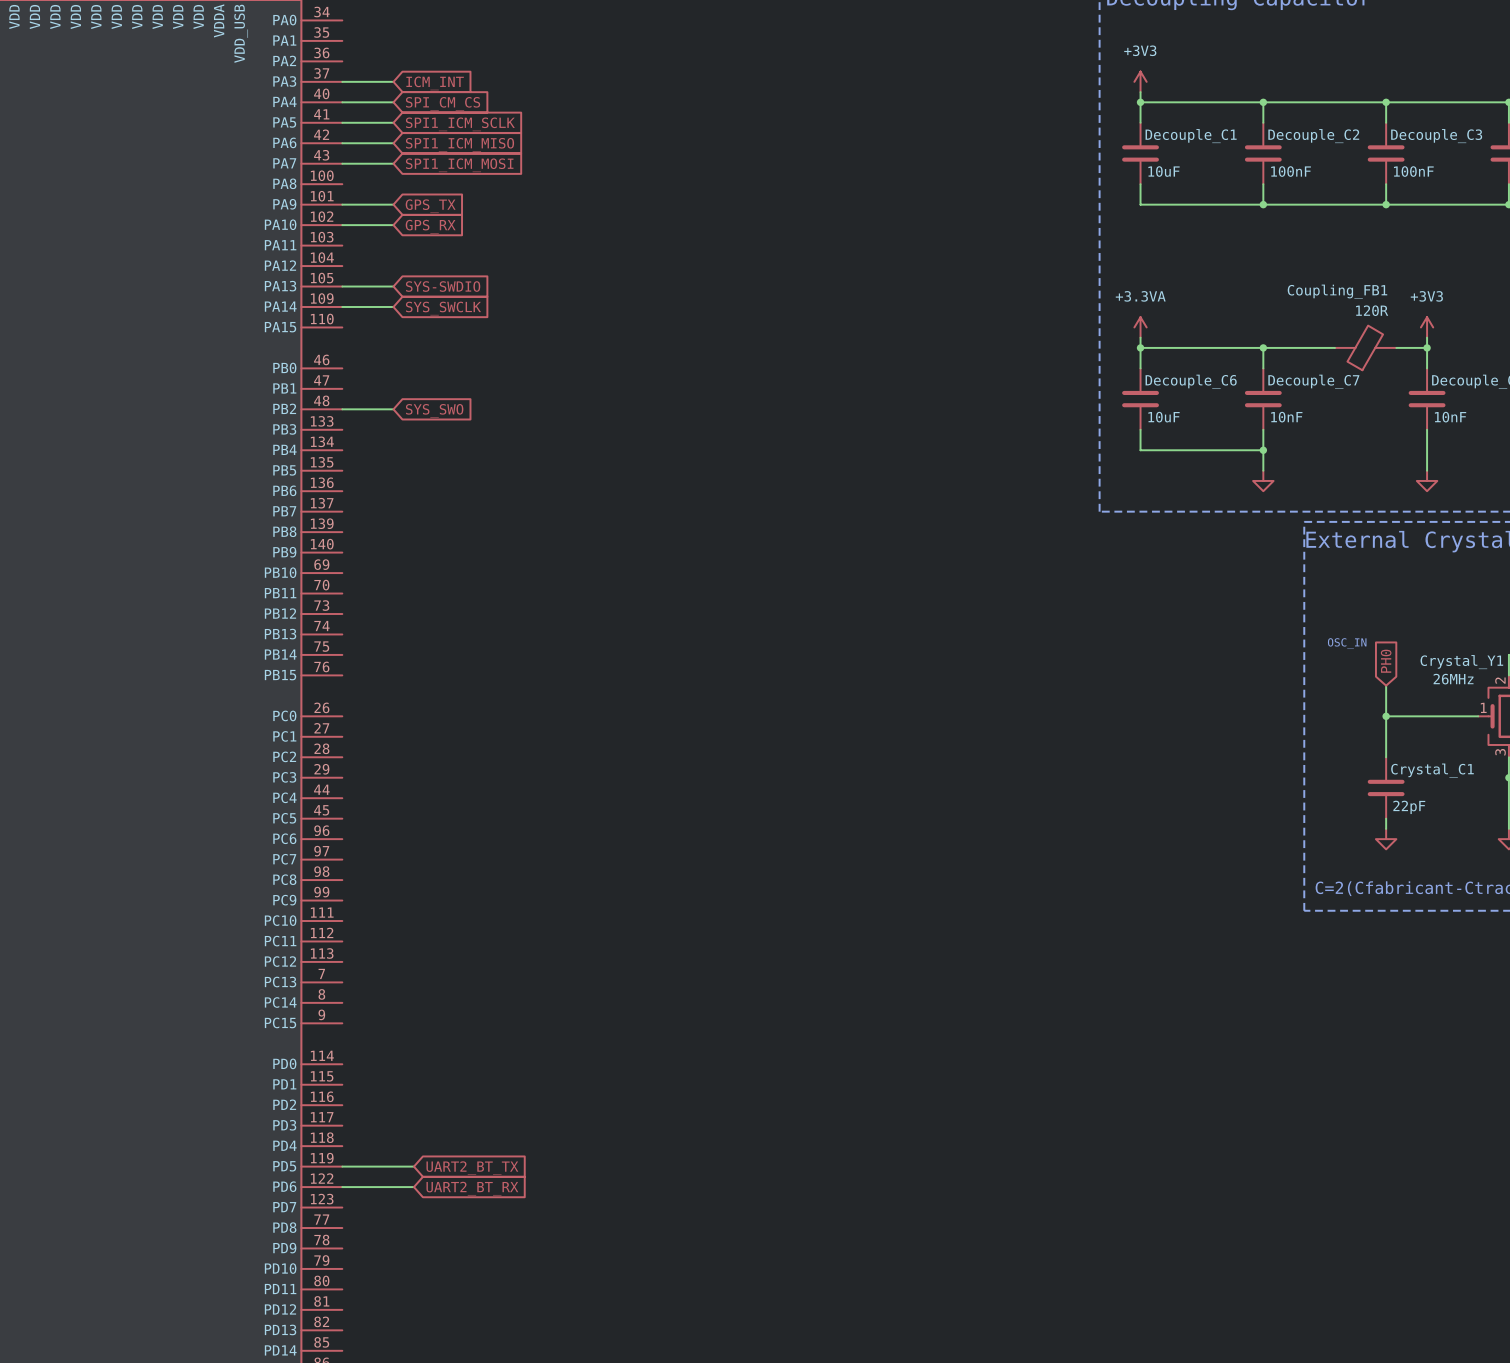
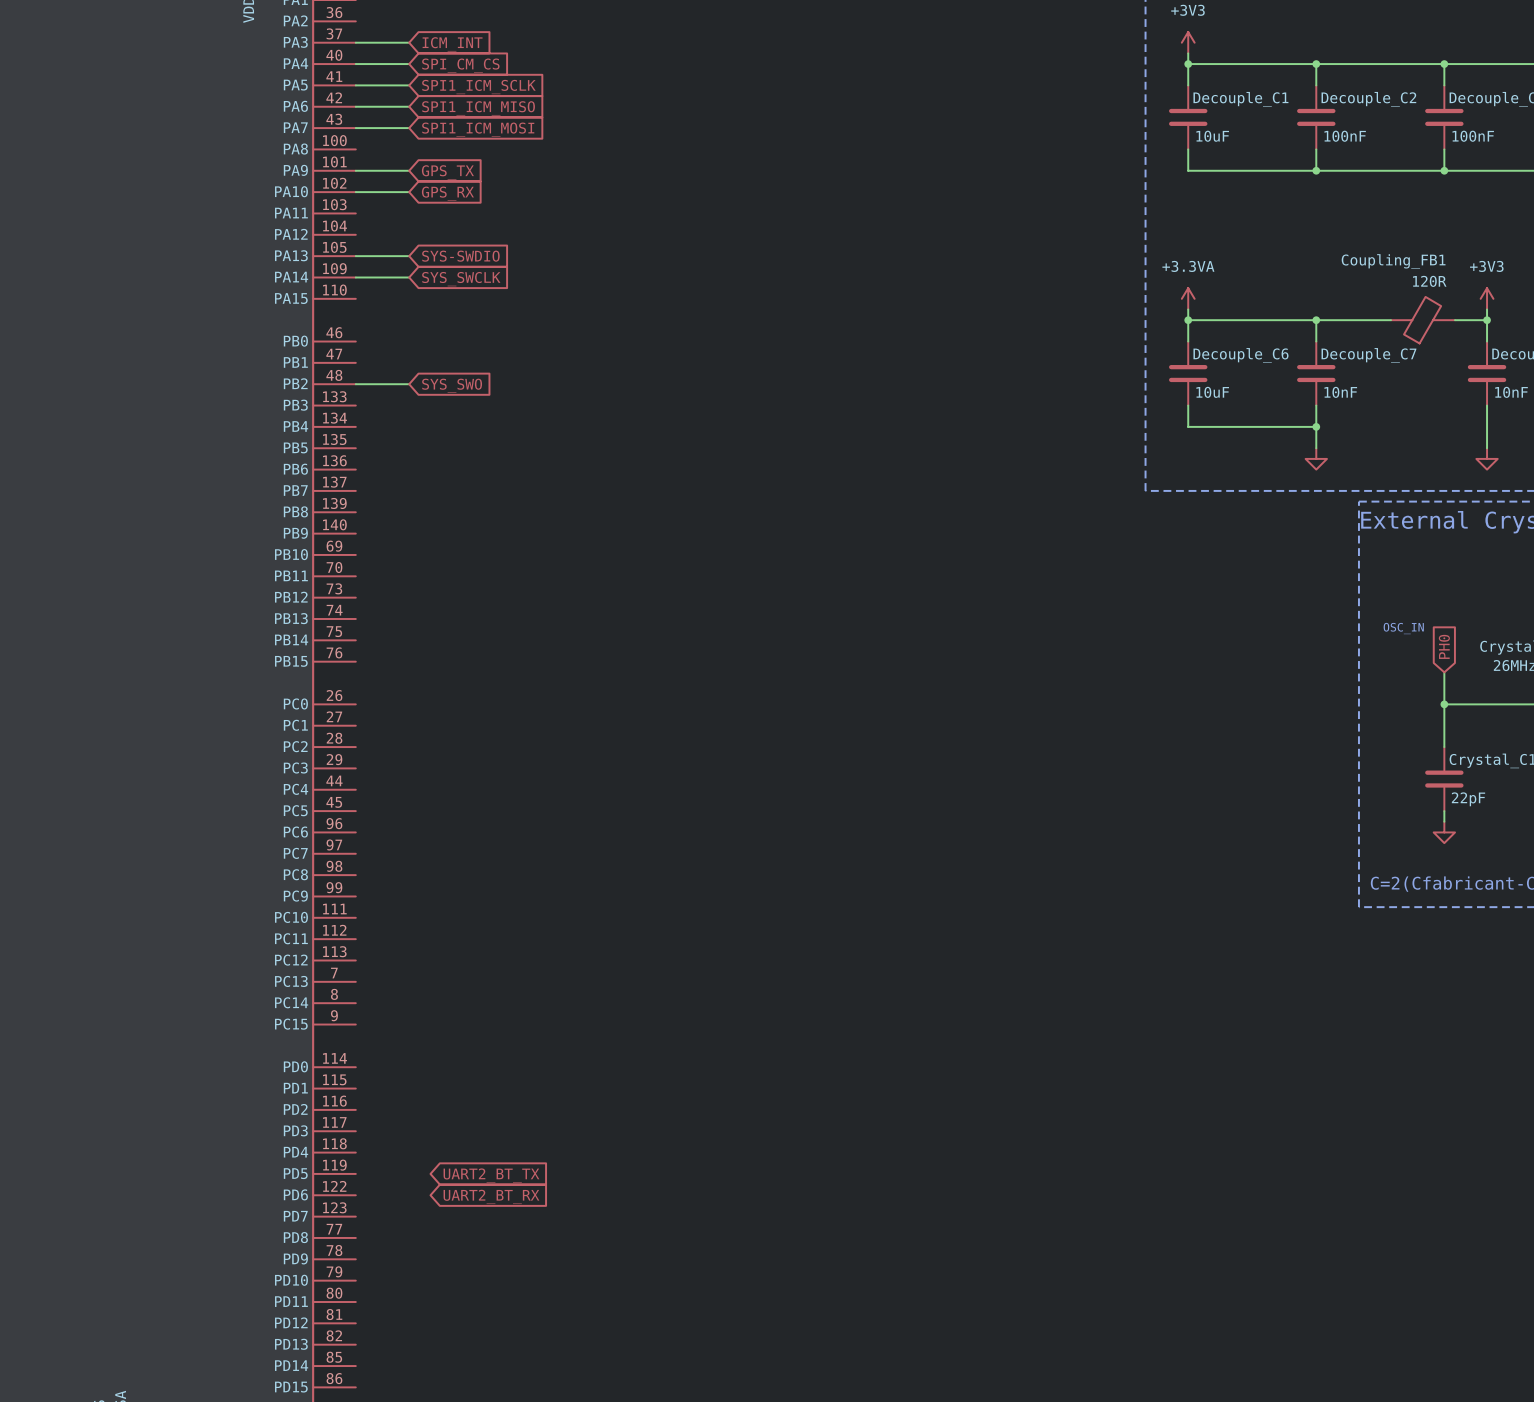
wire: (342, 1166) (413, 1166) -> none
wire: (342, 1187) (413, 1187) -> none

